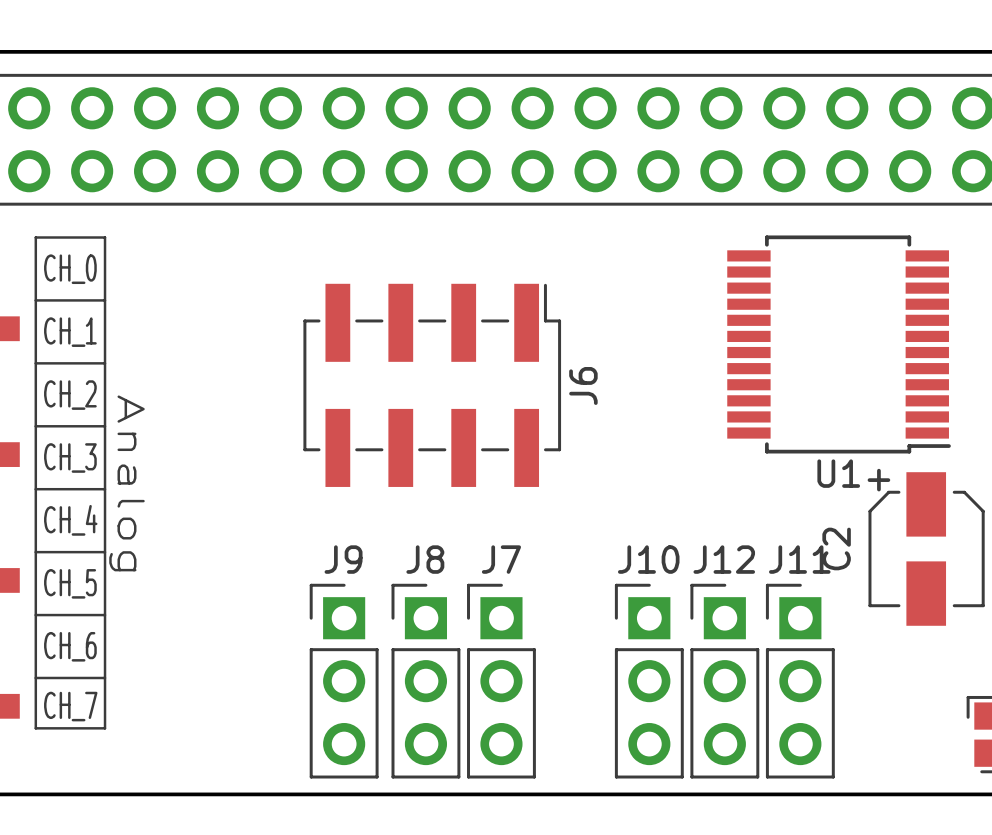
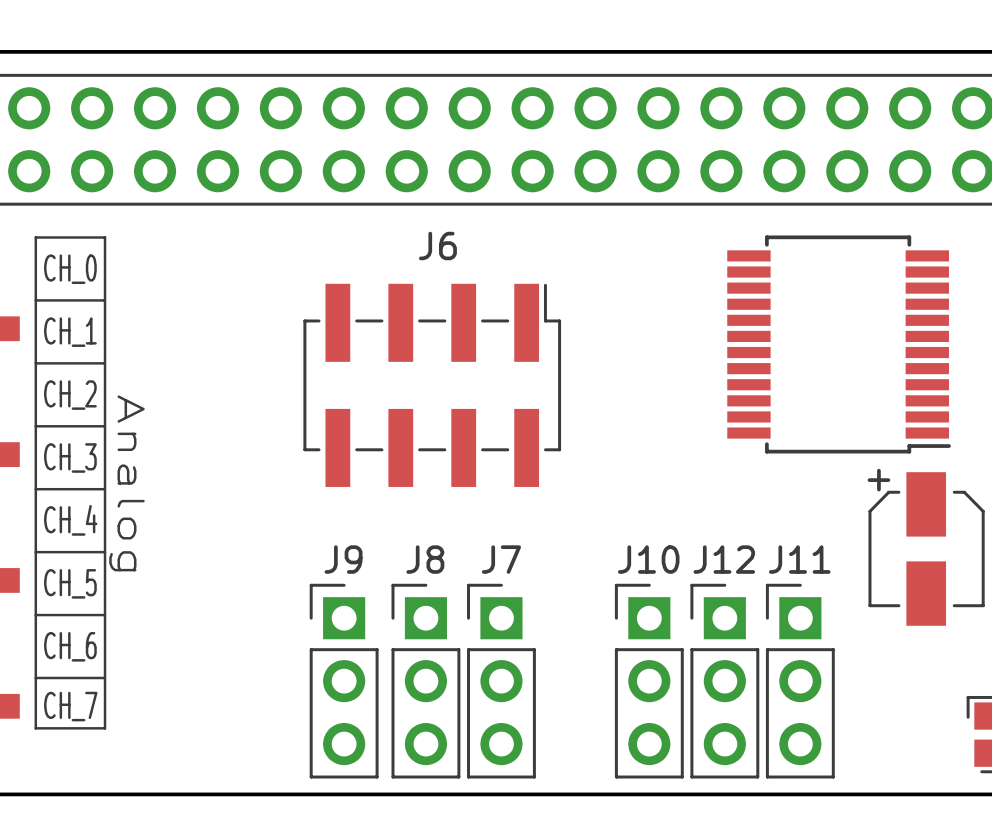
J6 name rotation: 0° (583, 385) -> 90° clockwise (437, 246)
J6 name position: J6 (583, 385) -> J6 (437, 246)
U1 name: U1 (838, 473) -> none
C2 name: C2 (836, 548) -> none

